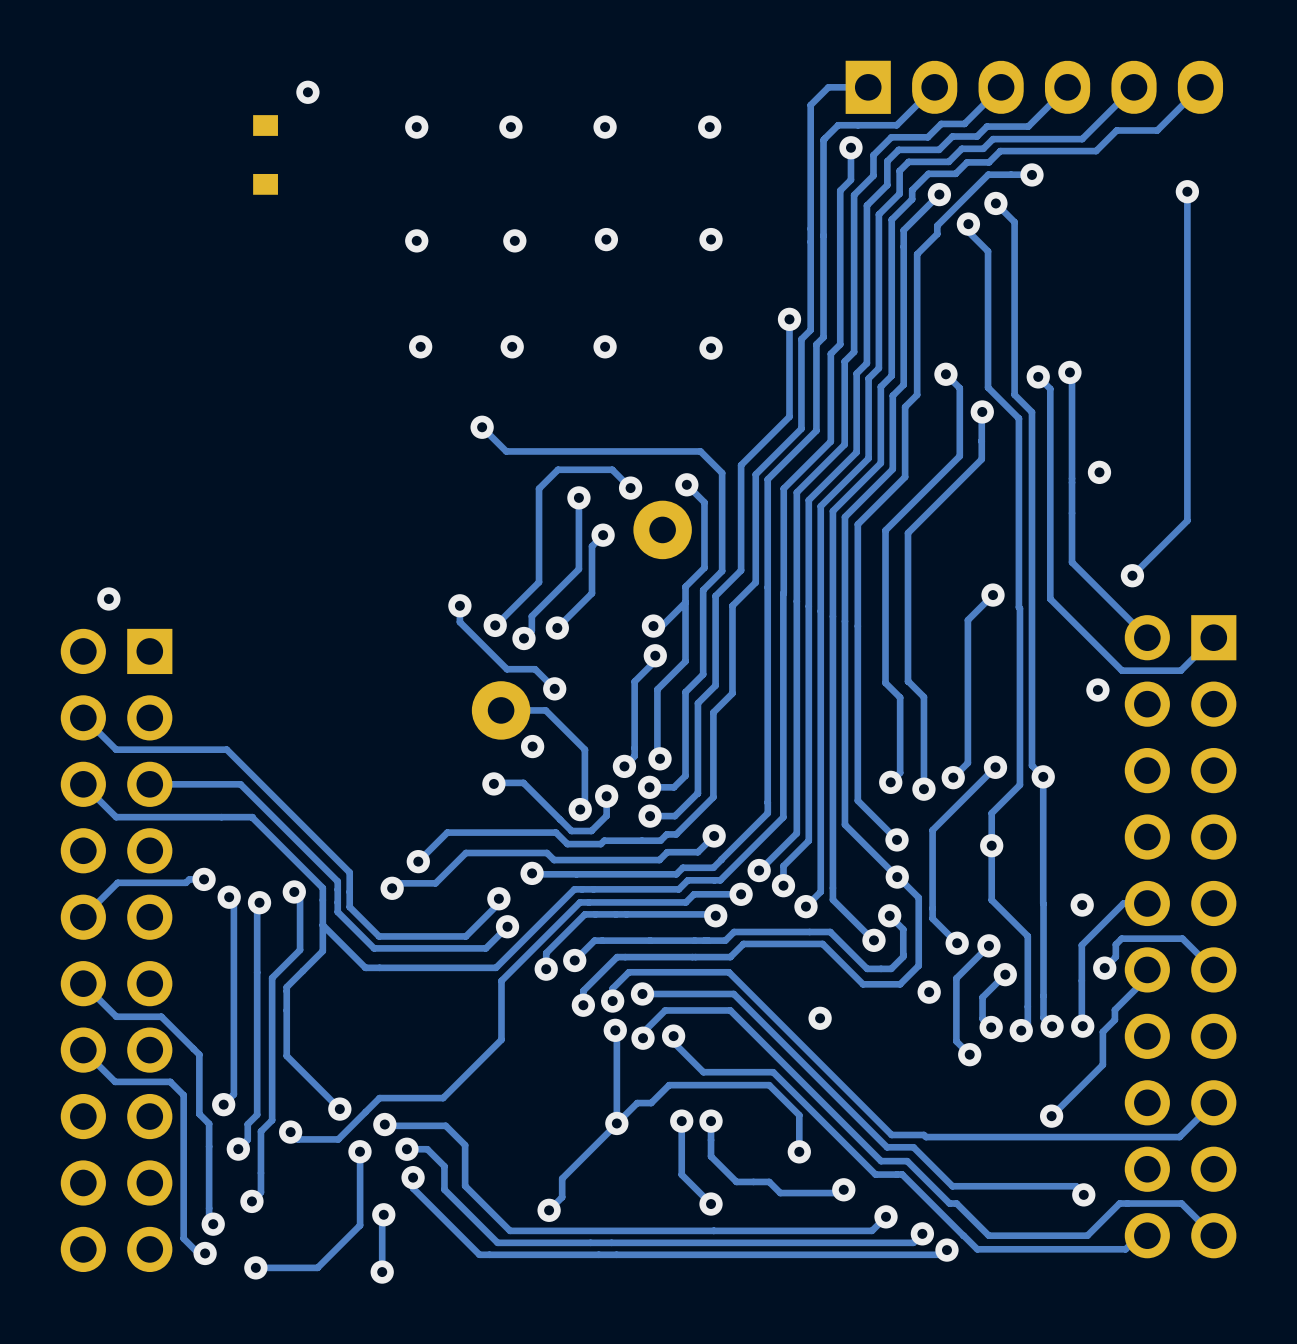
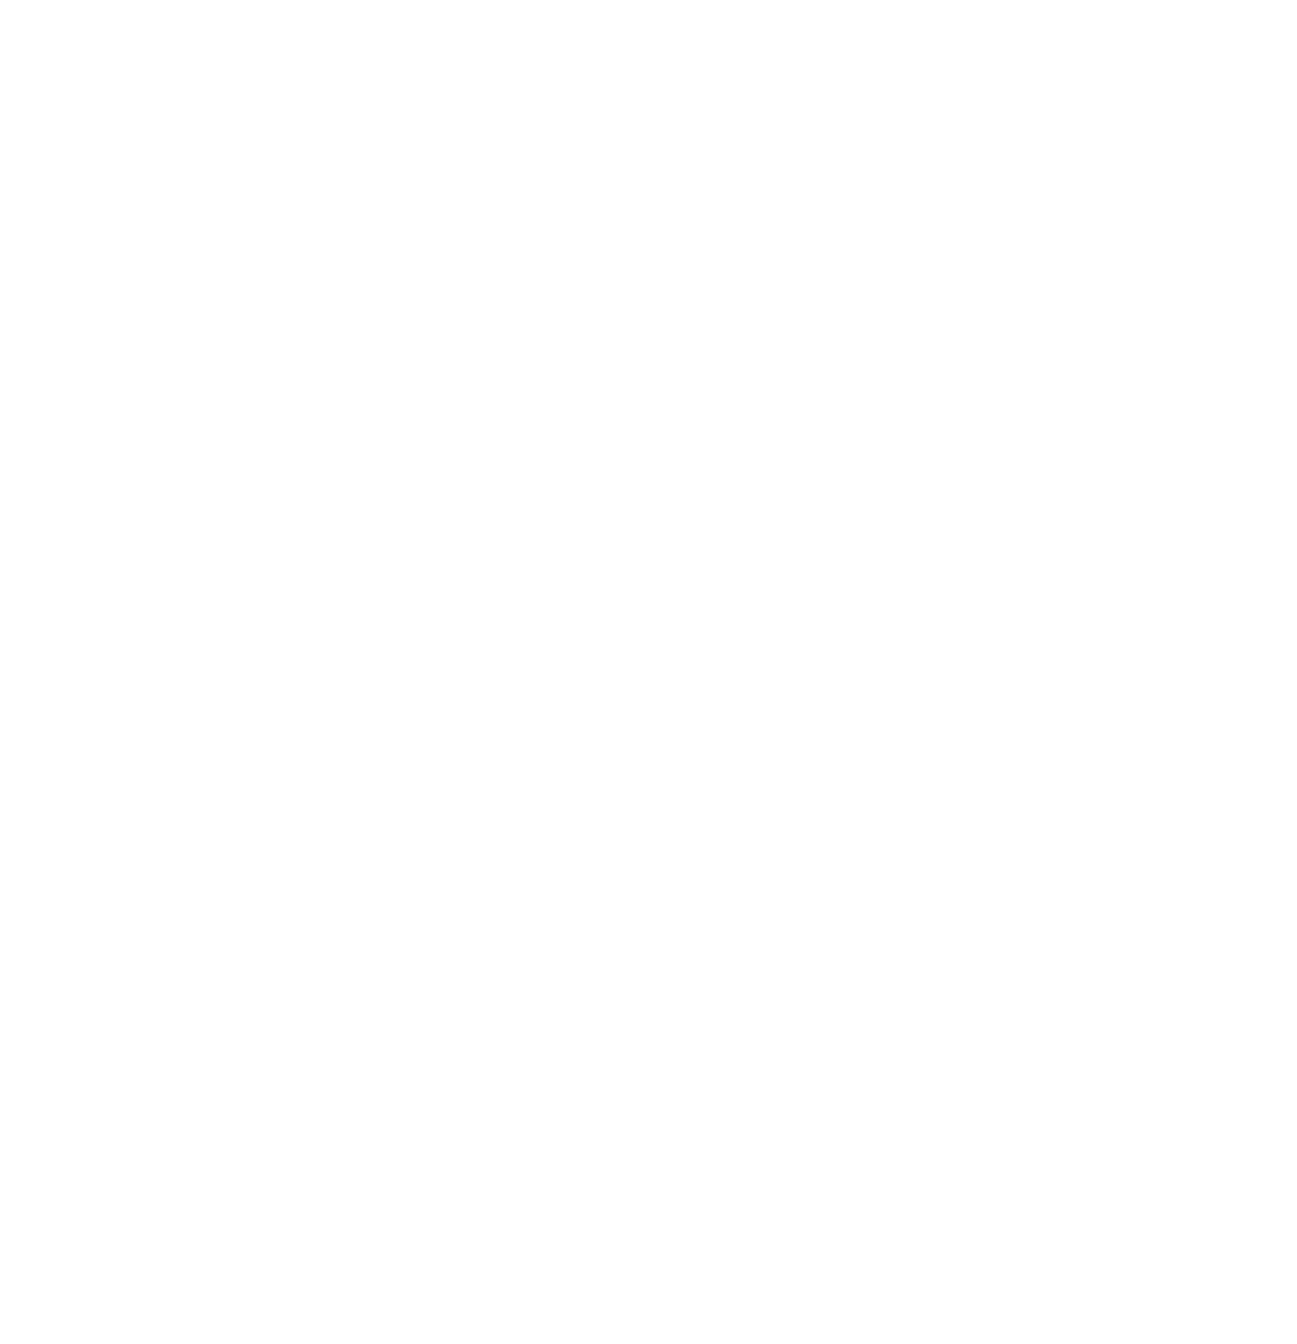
track: (934, 87) (896, 125) (838, 125) (824, 138) -> none
track: (1001, 87) (964, 123) (941, 123) (927, 137) (891, 137) (873, 155) (873, 175) (854, 195) (854, 352) (844, 361) (844, 444) (796, 492) (796, 833) (759, 870) -> none
part: (1034, 87) -> none
track: (1067, 87) (1028, 126) (987, 126) (977, 136) (952, 136) (939, 149) (898, 149) (887, 161) (887, 185) (866, 205) (866, 363) (856, 373) (856, 452) (808, 500) (808, 840) (783, 866) (783, 885) -> none
track: (1134, 87) (1082, 139) (993, 139) (983, 148) (961, 148) (948, 161) (908, 161) (899, 170) (899, 193) (878, 214) (878, 368) (868, 378) (868, 458) (820, 506) (820, 891) (805, 906) -> none
track: (1200, 87) (1157, 130) (1116, 130) (1096, 151) (1000, 151) (989, 162) (967, 162) (955, 173) (928, 173) (912, 190) (912, 199) (891, 219) (891, 375) (880, 386) (880, 463) (832, 511) (832, 899) (873, 940) -> none
via: (307, 92) -> none
track: (868, 102) (868, 87) (828, 87) (810, 105) (810, 330) (801, 339) (801, 428) (755, 474) (755, 582) (732, 605) (732, 693) (713, 712) (713, 797) (676, 834) (666, 834) (660, 840) (604, 840) (600, 844) (567, 844) (555, 832) (447, 832) (418, 861) -> none
via: (416, 127) -> none
via: (510, 127) -> none
via: (605, 127) -> none
via: (709, 127) -> none
track: (824, 138) (823, 337) (816, 344) (816, 430) (767, 479) (767, 813) (721, 859) -> none
track: (850, 147) (850, 179) (840, 190) (840, 344) (830, 353) (830, 441) (783, 488) (783, 817) (720, 880) (687, 880) (678, 889) (574, 889) (496, 967) (365, 967) (322, 925) -> none
via: (850, 147) -> none
part: (265, 154) -> none
track: (1031, 174) (988, 174) (937, 225) (937, 234) (917, 254) (917, 394) (905, 406) (905, 477) (857, 524) (857, 800) (897, 839) -> none
via: (1031, 174) -> none
track: (1187, 191) (1187, 520) (1132, 575) -> none
via: (1187, 191) -> none
track: (939, 194) (903, 230) (903, 384) (892, 395) (892, 469) (844, 517) (844, 824) (918, 897) (918, 965) (900, 984) (863, 984) (822, 943) (743, 943) (730, 957) (617, 957) (583, 990) (583, 1005) -> none
via: (939, 194) -> none
track: (995, 203) (1014, 222) (1014, 394) (1031, 412) (1031, 765) (1043, 776) (1043, 903) -> none
via: (995, 203) -> none
track: (968, 224) (968, 231) (988, 251) (988, 387) (1018, 418) (1019, 784) (991, 813) (991, 900) (1027, 936) (1027, 1024) (1021, 1030) -> none
via: (968, 224) -> none
via: (606, 239) -> none
via: (711, 239) -> none
via: (416, 240) -> none
via: (514, 240) -> none
track: (789, 319) (789, 416) (741, 465) (741, 570) (715, 595) (715, 685) (697, 703) (697, 793) -> none
via: (789, 319) -> none
via: (420, 346) -> none
via: (512, 346) -> none
via: (605, 346) -> none
via: (711, 348) -> none
track: (1069, 372) (1072, 374) (1072, 562) (1147, 637) -> none
via: (1069, 372) -> none
track: (945, 374) (959, 388) (959, 456) (885, 530) (885, 682) (900, 697) (900, 772) (890, 782) -> none
via: (945, 374) -> none
track: (1038, 376) (1050, 388) (1050, 598) (1121, 670) (1180, 670) (1213, 637) -> none
via: (1038, 376) -> none
track: (982, 411) (981, 459) (908, 533) (908, 681) -> none
via: (982, 411) -> none
track: (482, 427) (506, 451) (700, 451) (722, 473) (722, 571) (703, 590) (703, 674) (685, 692) (685, 775) (674, 787) (649, 787) -> none
via: (482, 427) -> none
via: (1099, 472) -> none
track: (686, 484) (704, 502) (704, 567) (685, 586) (685, 661) (657, 689) (657, 756) (660, 758) -> none
via: (686, 484) -> none
track: (630, 488) (612, 469) (557, 469) (539, 488) (539, 582) (495, 625) -> none
via: (630, 488) -> none
track: (578, 497) (578, 569) (531, 616) (531, 630) (523, 638) -> none
via: (578, 497) -> none
part: (662, 529) -> none
track: (603, 535) (592, 546) (592, 593) (557, 628) -> none
via: (603, 535) -> none
via: (1132, 575) -> none
track: (993, 595) (967, 620) (967, 763) (953, 777) -> none
via: (993, 595) -> none
via: (108, 598) -> none
track: (685, 602) (661, 626) (653, 626) -> none
track: (459, 605) (459, 622) (506, 669) (535, 669) (554, 688) -> none
via: (459, 605) -> none
via: (495, 625) -> none
via: (653, 626) -> none
via: (557, 628) -> none
via: (523, 638) -> none
track: (655, 655) (655, 660) (634, 681) (634, 756) (624, 766) -> none
via: (655, 655) -> none
track: (908, 681) (923, 697) (923, 789) -> none
via: (554, 688) -> none
via: (1097, 690) -> none
track: (501, 710) (545, 710) (584, 749) (584, 804) (580, 809) -> none
part: (501, 710) -> none
track: (83, 717) (116, 749) (226, 749) (349, 872) (349, 907) (379, 936) (465, 936) (498, 903) (498, 898) -> none
via: (532, 746) -> none
via: (660, 758) -> none
via: (624, 766) -> none
track: (995, 767) (932, 830) (932, 918) (957, 943) -> none
via: (995, 767) -> none
via: (1043, 776) -> none
via: (953, 777) -> none
via: (890, 782) -> none
track: (493, 783) (523, 782) (571, 831) (591, 831) (606, 815) (606, 796) -> none
via: (493, 783) -> none
track: (92, 784) (83, 784) (116, 817) (252, 817) -> none
track: (149, 784) (240, 784) (337, 881) (337, 912) (374, 948) (485, 948) (507, 926) -> none
via: (649, 787) -> none
via: (923, 789) -> none
track: (697, 793) (674, 816) (650, 816) -> none
via: (606, 796) -> none
via: (580, 809) -> none
via: (650, 816) -> none
track: (252, 817) (322, 888) (322, 951) (286, 987) (286, 1055) (339, 1109) -> none
track: (714, 835) (697, 852) (667, 852) (659, 860) (554, 860) (547, 852) (465, 852) (435, 883) (397, 883) (392, 888) -> none
via: (714, 835) -> none
via: (897, 839) -> none
via: (991, 845) -> none
track: (721, 859) (713, 867) (682, 867) (676, 874) (532, 873) -> none
via: (418, 861) -> none
via: (759, 870) -> none
via: (532, 873) -> none
via: (897, 877) -> none
track: (203, 878) (189, 879) (186, 882) (117, 882) (83, 917) -> none
via: (204, 879) -> none
via: (783, 885) -> none
via: (392, 888) -> none
track: (294, 891) (300, 897) (300, 950) (272, 977) (272, 1120) (260, 1131) (260, 1192) (251, 1201) -> none
via: (294, 891) -> none
track: (741, 894) (694, 894) (685, 902) (579, 902) (501, 980) (501, 1039) (443, 1098) (379, 1098) (338, 1139) (297, 1139) (290, 1132) -> none
via: (741, 894) -> none
track: (229, 897) (233, 901) (233, 1094) (223, 1104) -> none
via: (229, 897) -> none
via: (498, 898) -> none
track: (259, 902) (257, 905) (257, 1114) (247, 1124) (247, 1139) (238, 1149) -> none
via: (259, 902) -> none
track: (1147, 903) (1123, 903) (1081, 945) (1082, 1026) -> none
track: (1043, 904) (1043, 1017) (1052, 1026) -> none
via: (1082, 905) -> none
via: (805, 906) -> none
track: (715, 915) (584, 914) (546, 953) (546, 969) -> none
via: (715, 915) -> none
track: (889, 915) (903, 929) (903, 956) (891, 968) (867, 968) (830, 931) (734, 931) (725, 940) (594, 940) (574, 960) -> none
via: (889, 915) -> none
via: (507, 926) -> none
part: (1180, 936) -> none
via: (873, 940) -> none
via: (957, 943) -> none
track: (988, 945) (956, 978) (956, 1041) (969, 1054) -> none
via: (988, 945) -> none
part: (116, 950) -> none
via: (574, 960) -> none
track: (1104, 968) (1115, 956) (1115, 944) (1121, 938) (1182, 938) (1213, 969) -> none
via: (1104, 968) -> none
via: (546, 969) -> none
track: (1147, 969) (1147, 977) (1114, 1009) (1114, 1019) (1102, 1031) (1102, 1064) (1051, 1116) -> none
track: (1005, 974) (982, 997) (982, 1018) (991, 1027) -> none
via: (1005, 974) -> none
track: (83, 983) (116, 1016) (161, 1016) (199, 1054) (199, 1114) (209, 1123) (209, 1220) (213, 1224) -> none
via: (929, 992) -> none
track: (642, 993) (733, 993) (887, 1147) (913, 1147) (952, 1186) (1076, 1186) (1083, 1194) -> none
via: (642, 993) -> none
track: (612, 1001) (612, 988) (628, 972) (728, 972) (891, 1134) (923, 1134) (926, 1137) (1179, 1137) (1213, 1102) -> none
via: (612, 1001) -> none
via: (583, 1005) -> none
via: (820, 1018) -> none
via: (1052, 1026) -> none
via: (1082, 1026) -> none
via: (991, 1027) -> none
track: (615, 1030) (616, 1031) (616, 1124) (562, 1178) (562, 1197) (549, 1210) -> none
via: (615, 1030) -> none
via: (1021, 1030) -> none
track: (673, 1036) (673, 1042) (703, 1072) (773, 1072) (875, 1174) (902, 1174) (963, 1235) -> none
via: (673, 1036) -> none
track: (643, 1038) (643, 1032) (665, 1010) (730, 1010) (881, 1161) (907, 1161) (949, 1203) (956, 1203) (988, 1235) (1087, 1235) (1119, 1203) (1181, 1203) (1213, 1235) -> none
via: (643, 1038) -> none
track: (83, 1050) (115, 1081) (170, 1081) (183, 1095) (183, 1238) (198, 1253) (205, 1253) -> none
via: (969, 1054) -> none
via: (223, 1104) -> none
via: (339, 1109) -> none
via: (1051, 1116) -> none
track: (681, 1121) (681, 1174) (711, 1204) -> none
via: (681, 1121) -> none
track: (711, 1121) (711, 1156) (736, 1181) (769, 1181) (780, 1193) (840, 1193) (843, 1189) -> none
via: (711, 1121) -> none
track: (616, 1123) (637, 1103) (651, 1103) (669, 1085) (769, 1085) (799, 1115) (799, 1151) -> none
via: (616, 1123) -> none
track: (384, 1124) (445, 1125) (465, 1145) (465, 1186) (510, 1230) (872, 1230) (886, 1216) -> none
via: (384, 1124) -> none
via: (290, 1132) -> none
via: (238, 1149) -> none
track: (406, 1149) (427, 1149) (444, 1166) (444, 1189) (497, 1242) (913, 1242) (922, 1233) -> none
via: (406, 1149) -> none
via: (359, 1151) -> none
track: (360, 1151) (360, 1225) (317, 1267) (255, 1267) -> none
via: (799, 1151) -> none
track: (413, 1177) (413, 1188) (479, 1254) (942, 1254) (946, 1250) -> none
via: (413, 1177) -> none
via: (843, 1189) -> none
via: (1083, 1194) -> none
via: (251, 1201) -> none
via: (711, 1204) -> none
via: (549, 1210) -> none
track: (383, 1214) (382, 1216) (382, 1272) -> none
via: (383, 1214) -> none
via: (886, 1216) -> none
via: (213, 1224) -> none
via: (922, 1233) -> none
track: (1147, 1235) (1139, 1235) (1125, 1249) (977, 1249) (963, 1235) -> none
via: (946, 1250) -> none
via: (205, 1253) -> none
via: (255, 1267) -> none
via: (382, 1272) -> none

